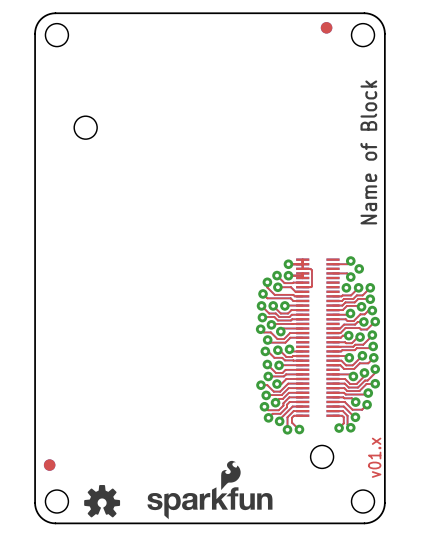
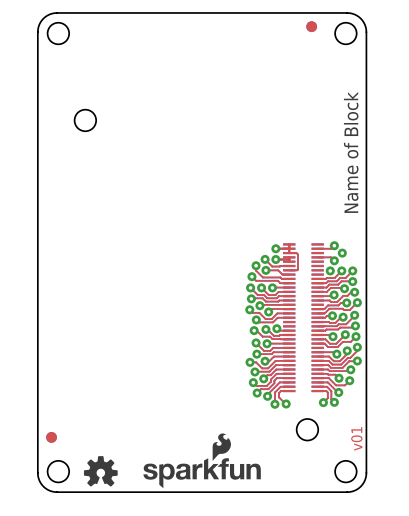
text: v01.x (374, 457) -> v01 (356, 438)

